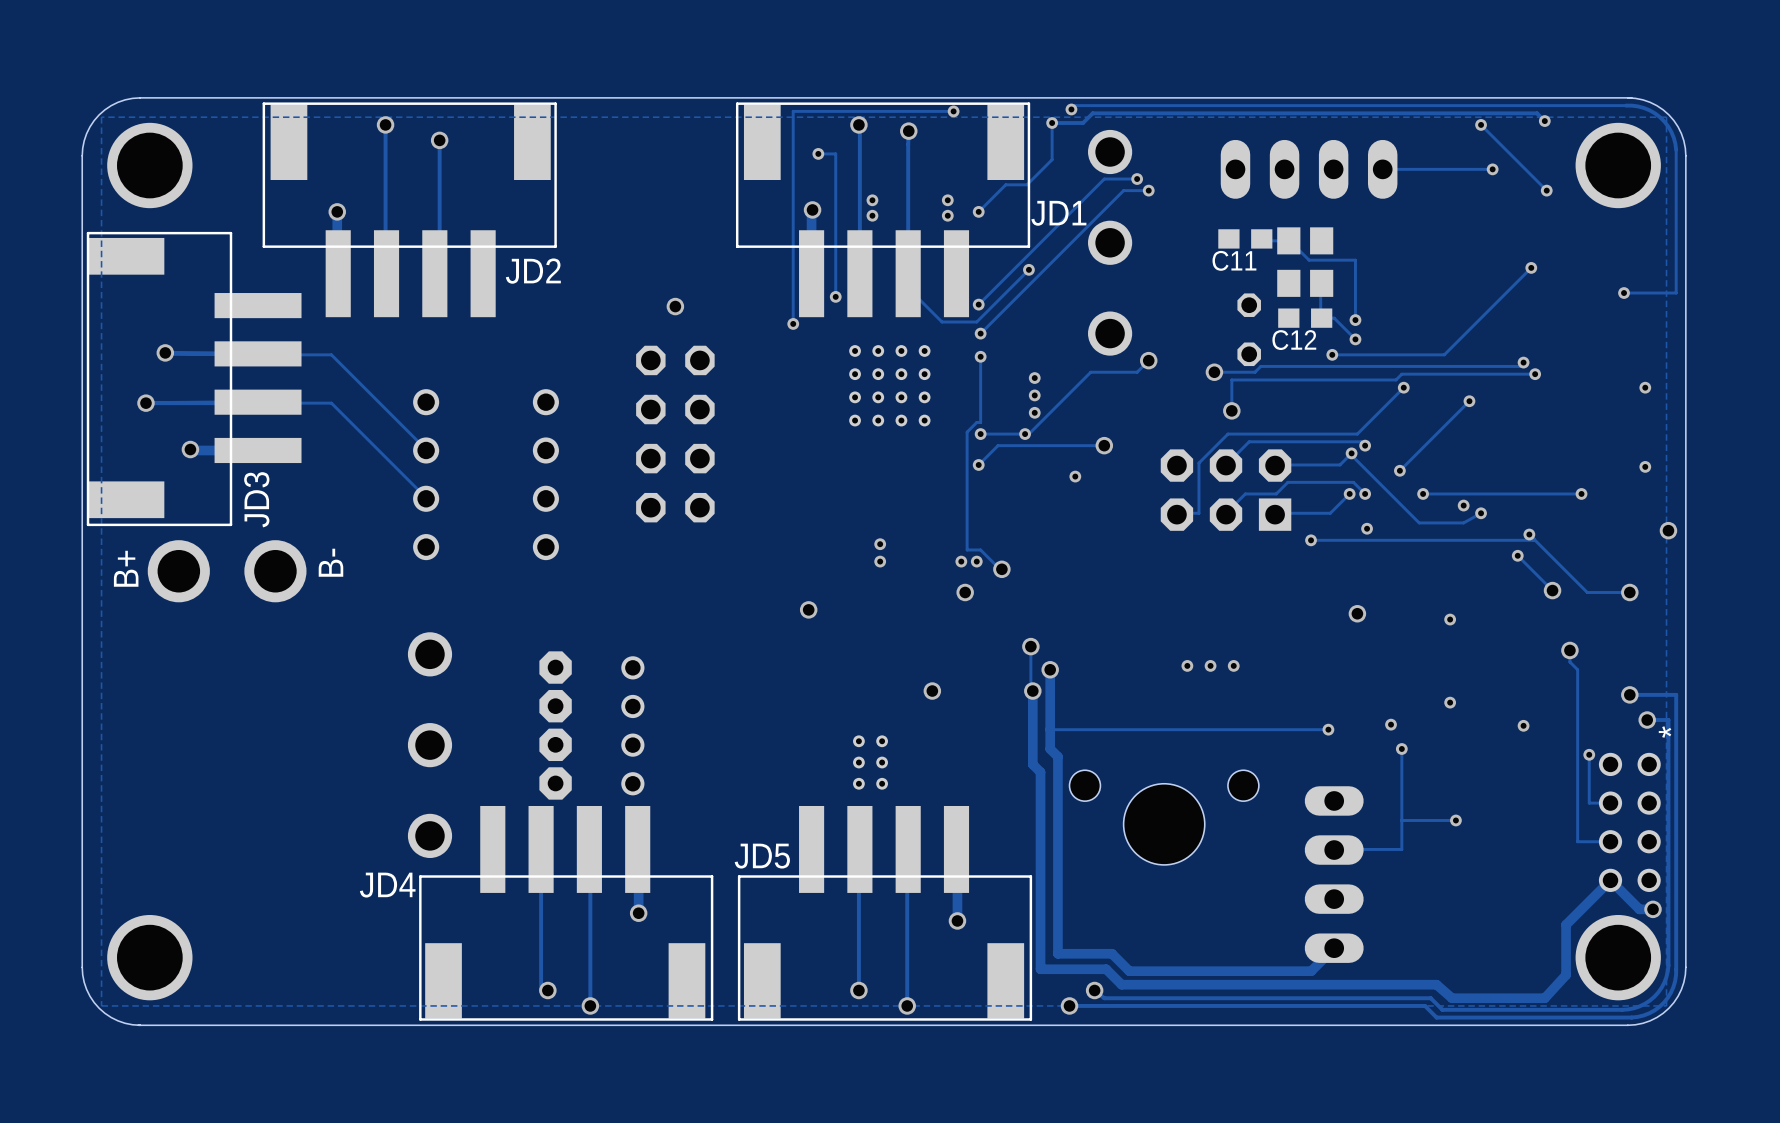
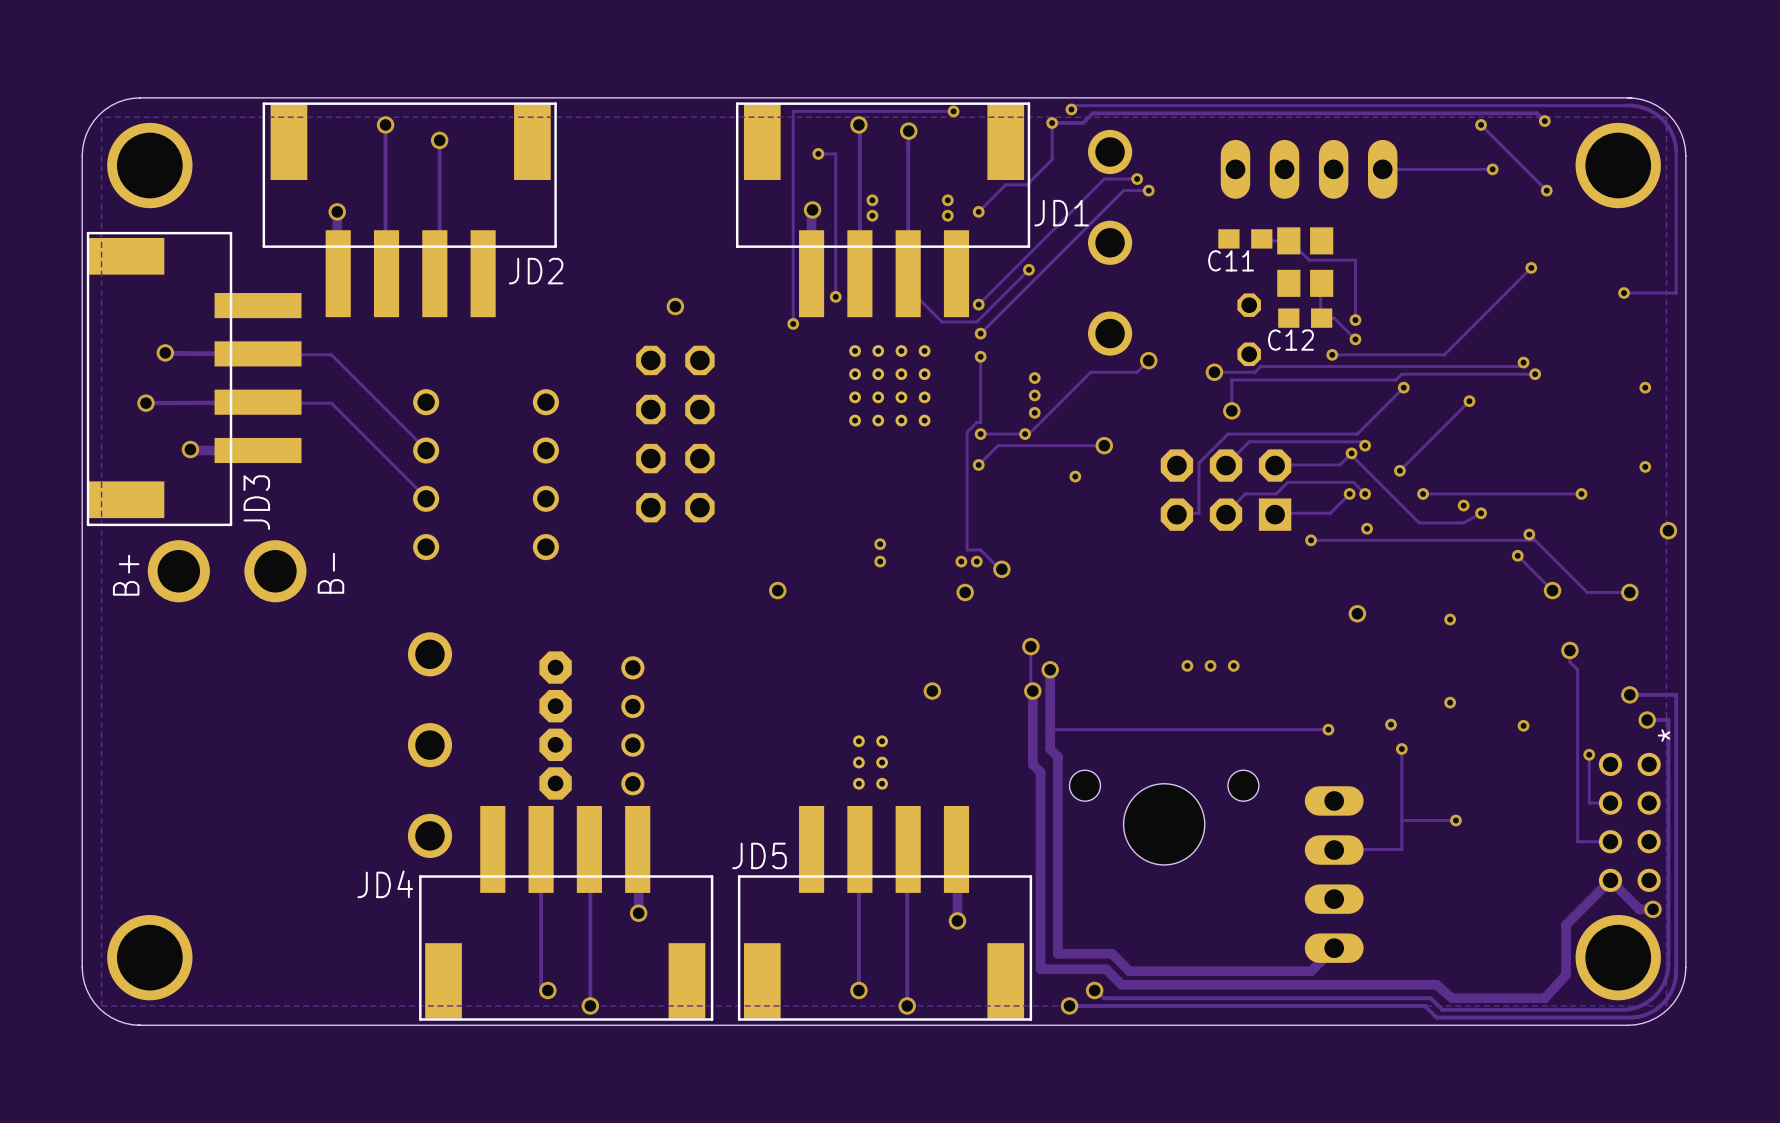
via position: (808, 609) -> (777, 590)

